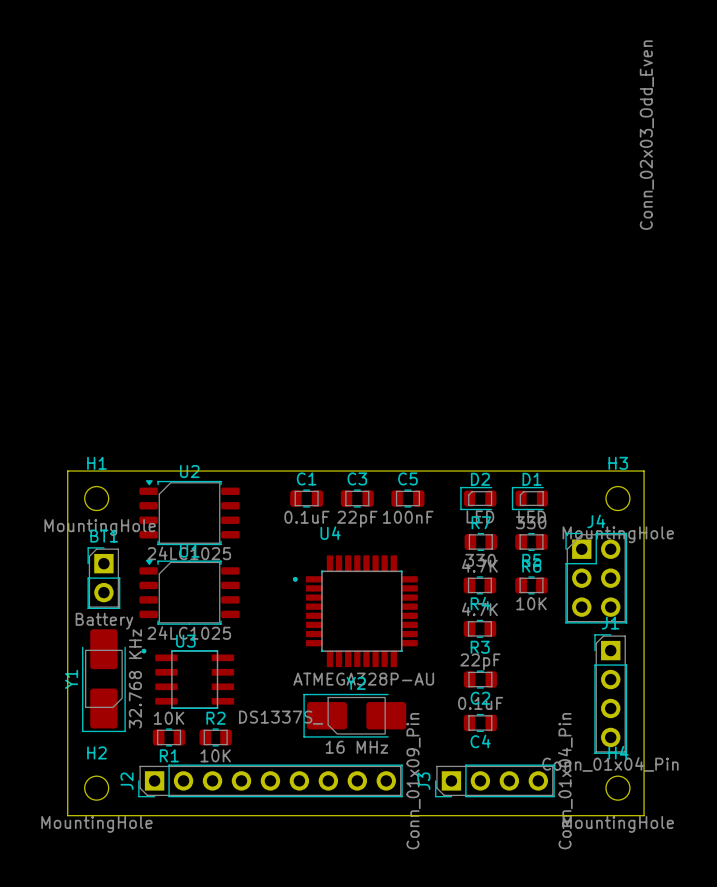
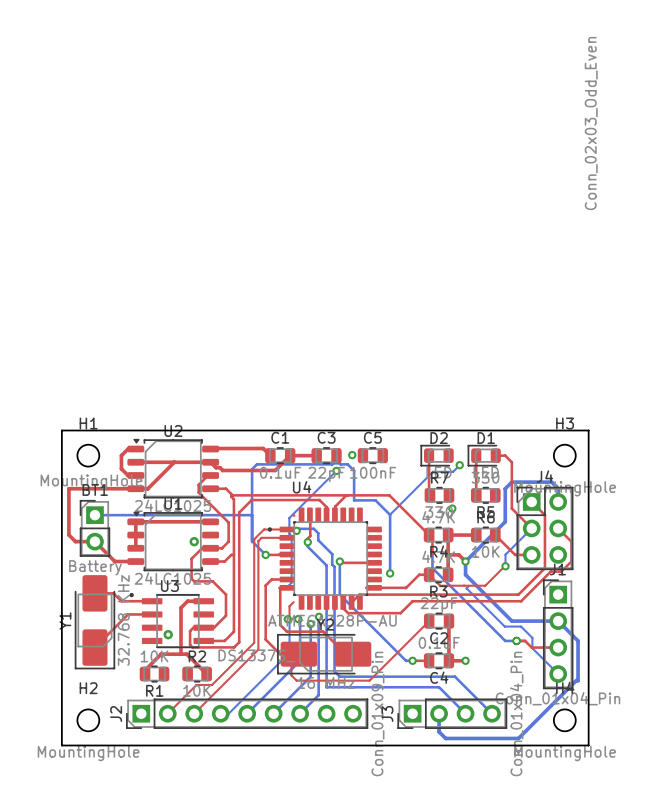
top track: none -> (135, 449) (128, 449) (121, 455) (121, 468) (128, 475) (135, 475)
top track: none -> (210, 449) (263, 448) (270, 455)
via: none -> (352, 455)
top track: none -> (316, 455) (290, 455) (275, 470) (222, 470) (210, 462) (135, 462)
top track: none -> (429, 455) (429, 495)
top track: none -> (476, 455) (476, 495)
top track: none -> (495, 455) (505, 455) (511, 462) (511, 508) (531, 528)
top track: none -> (174, 462) (147, 488) (68, 488) (68, 535) (75, 541) (94, 541) (114, 561) (135, 561)
bottom track: none -> (459, 465) (453, 471) (432, 471) (390, 514)
via: none -> (459, 465)
bottom track: none -> (336, 470) (289, 518) (289, 533) (291, 536) (291, 582) (286, 587) (283, 587)
via: none -> (336, 470)
top track: none -> (210, 475) (208, 475) (198, 484) (198, 492) (228, 522) (228, 541) (222, 548) (202, 548) (191, 558) (191, 578) (194, 581) (212, 581) (226, 594) (226, 615) (214, 627) (193, 627) (190, 631) (190, 644) (192, 647) (234, 647) (239, 642) (239, 512) (251, 500) (319, 500) (327, 507) (327, 515)
top track: none -> (210, 488) (226, 488) (231, 496)
top track: none -> (346, 495) (335, 506) (335, 515)
top track: none -> (231, 496) (389, 495) (432, 538) (432, 554)
top track: none -> (231, 496) (233, 499) (233, 631) (224, 640) (203, 640)
top track: none -> (531, 501) (544, 515) (544, 568) (518, 594) (359, 594) (352, 602)
bottom track: none -> (558, 501) (558, 488) (551, 482) (511, 482) (505, 488) (505, 521) (465, 561) (465, 574) (511, 621) (558, 621) (578, 640) (578, 680) (518, 738) (445, 738) (439, 731) (439, 713)
via: none -> (452, 508)
bottom track: none -> (94, 515) (252, 515)
top track: none -> (293, 515) (294, 515)
top track: none -> (310, 515) (310, 536) (307, 542)
bottom track: none -> (390, 514) (375, 500) (354, 500) (354, 470) (347, 464) (256, 464) (252, 469) (252, 541) (265, 554)
bottom track: none -> (390, 514) (390, 573)
top track: none -> (210, 521) (135, 521) (135, 548)
bottom track: none -> (531, 528) (505, 554) (505, 566)
top track: none -> (558, 528) (571, 541) (571, 561) (561, 571) (550, 571) (521, 601) (412, 601) (400, 613) (348, 613) (343, 608) (343, 602)
top track: none -> (279, 529) (264, 529) (254, 539) (254, 642) (212, 684) (196, 684) (167, 713)
bottom track: none -> (296, 530) (298, 528) (313, 528) (318, 533) (318, 540) (332, 554) (332, 564) (334, 566) (334, 671) (339, 676) (454, 676) (492, 713)
via: none -> (296, 530)
top track: none -> (476, 535) (448, 535) (448, 574)
top track: none -> (495, 535) (515, 554) (531, 554)
top track: none -> (280, 539) (261, 537) (258, 541) (258, 649) (194, 713)
via: none -> (194, 541)
bottom track: none -> (307, 542) (307, 546) (326, 565) (326, 687) (439, 687) (465, 713)
via: none -> (307, 542)
top track: none -> (279, 554) (265, 554)
top track: none -> (233, 554) (231, 554) (224, 561) (210, 561)
via: none -> (265, 554)
bottom track: none -> (432, 554) (432, 568) (505, 640) (525, 640)
top track: none -> (448, 554) (458, 554) (465, 561)
top track: none -> (339, 561) (366, 562)
bottom track: none -> (339, 561) (339, 594) (405, 660) (412, 660)
via: none -> (339, 561)
via: none -> (465, 561)
top track: none -> (505, 566) (485, 585) (440, 585) (429, 574) (419, 574) (405, 588) (366, 587)
via: none -> (505, 566)
via: none -> (390, 573)
top track: none -> (279, 579) (271, 579) (265, 585) (265, 639) (280, 654) (291, 654)
bottom track: none -> (468, 585) (466, 588) (504, 626) (521, 626) (532, 637) (532, 648) (558, 674)
top track: none -> (279, 587) (280, 625) (286, 631) (323, 631) (345, 654)
top track: none -> (94, 593) (113, 593) (121, 601) (152, 601)
top track: none -> (203, 601) (187, 601) (181, 607) (181, 654)
top track: none -> (293, 602) (289, 606) (287, 619)
top track: none -> (152, 614) (128, 614) (94, 647)
bottom track: none -> (319, 616) (318, 695) (300, 713)
via: none -> (319, 616)
bottom track: none -> (287, 619) (289, 620) (289, 652) (228, 713) (220, 713)
via: none -> (287, 619)
bottom track: none -> (298, 619) (300, 621) (300, 660) (247, 713)
via: none -> (298, 619)
top track: none -> (429, 621) (369, 680) (296, 680) (291, 675) (291, 654)
top track: none -> (448, 621) (448, 660) (465, 660)
bottom track: none -> (310, 624) (310, 676) (273, 713)
via: none -> (310, 624)
via: none -> (168, 634)
top track: none -> (516, 640) (525, 640) (531, 647) (558, 647)
via: none -> (516, 640)
top track: none -> (412, 660) (429, 660)
via: none -> (412, 660)
via: none -> (465, 660)
top track: none -> (145, 674) (145, 670) (161, 654) (186, 654) (206, 674)

